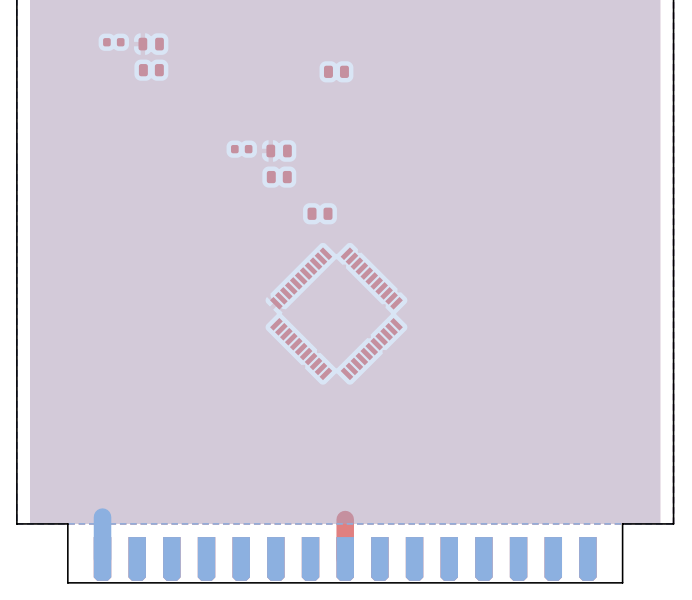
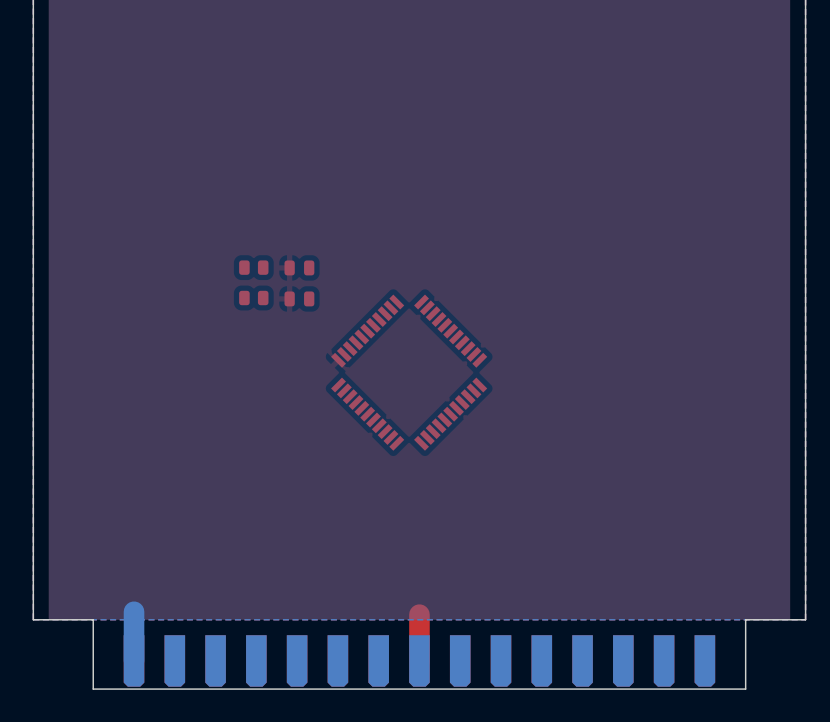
part: (113, 42) -> none
part: (151, 44) -> none
part: (151, 70) -> none
part: (336, 71) -> none
part: (241, 149) -> none
part: (279, 150) -> none
part: (279, 177) -> none
part: (320, 213) -> none
part: none -> (253, 267)
part: none -> (299, 267)
part: none -> (253, 298)
part: none -> (299, 298)

